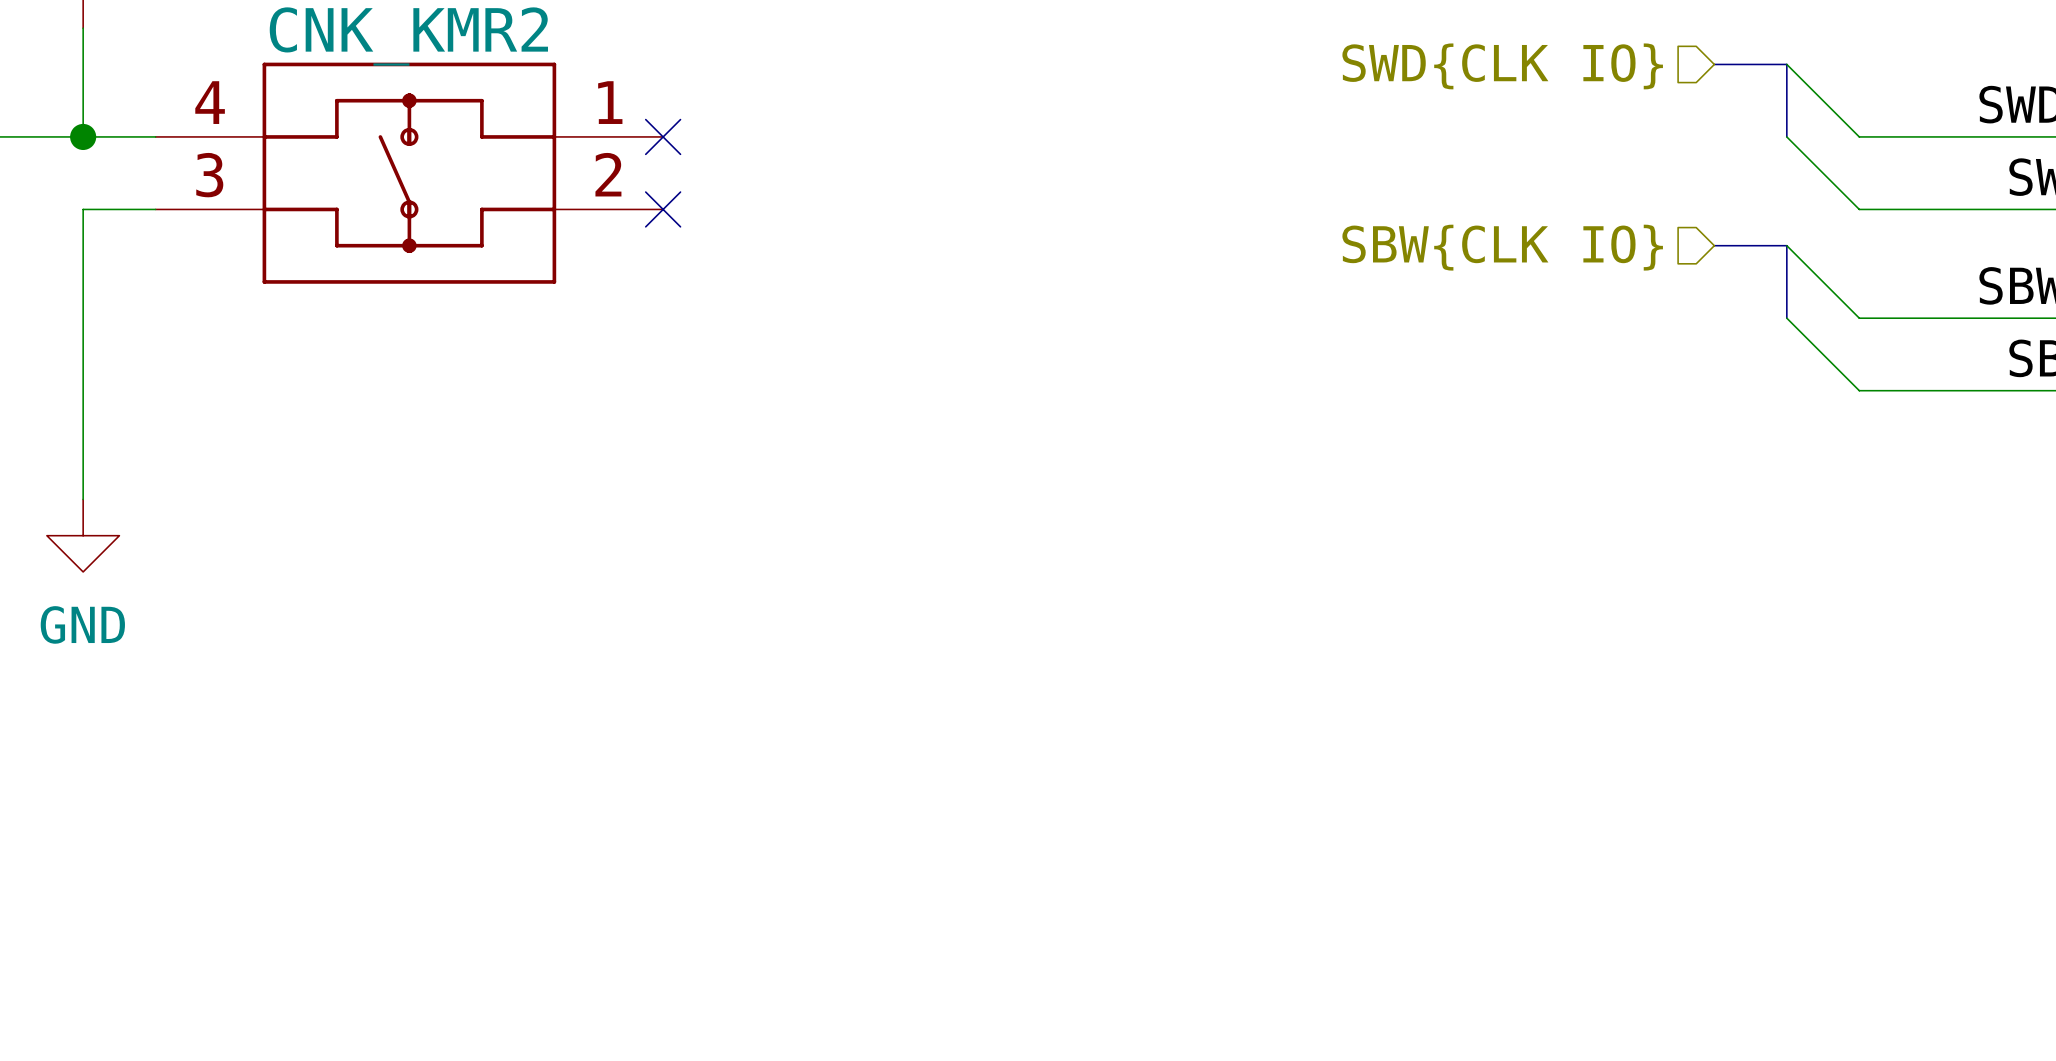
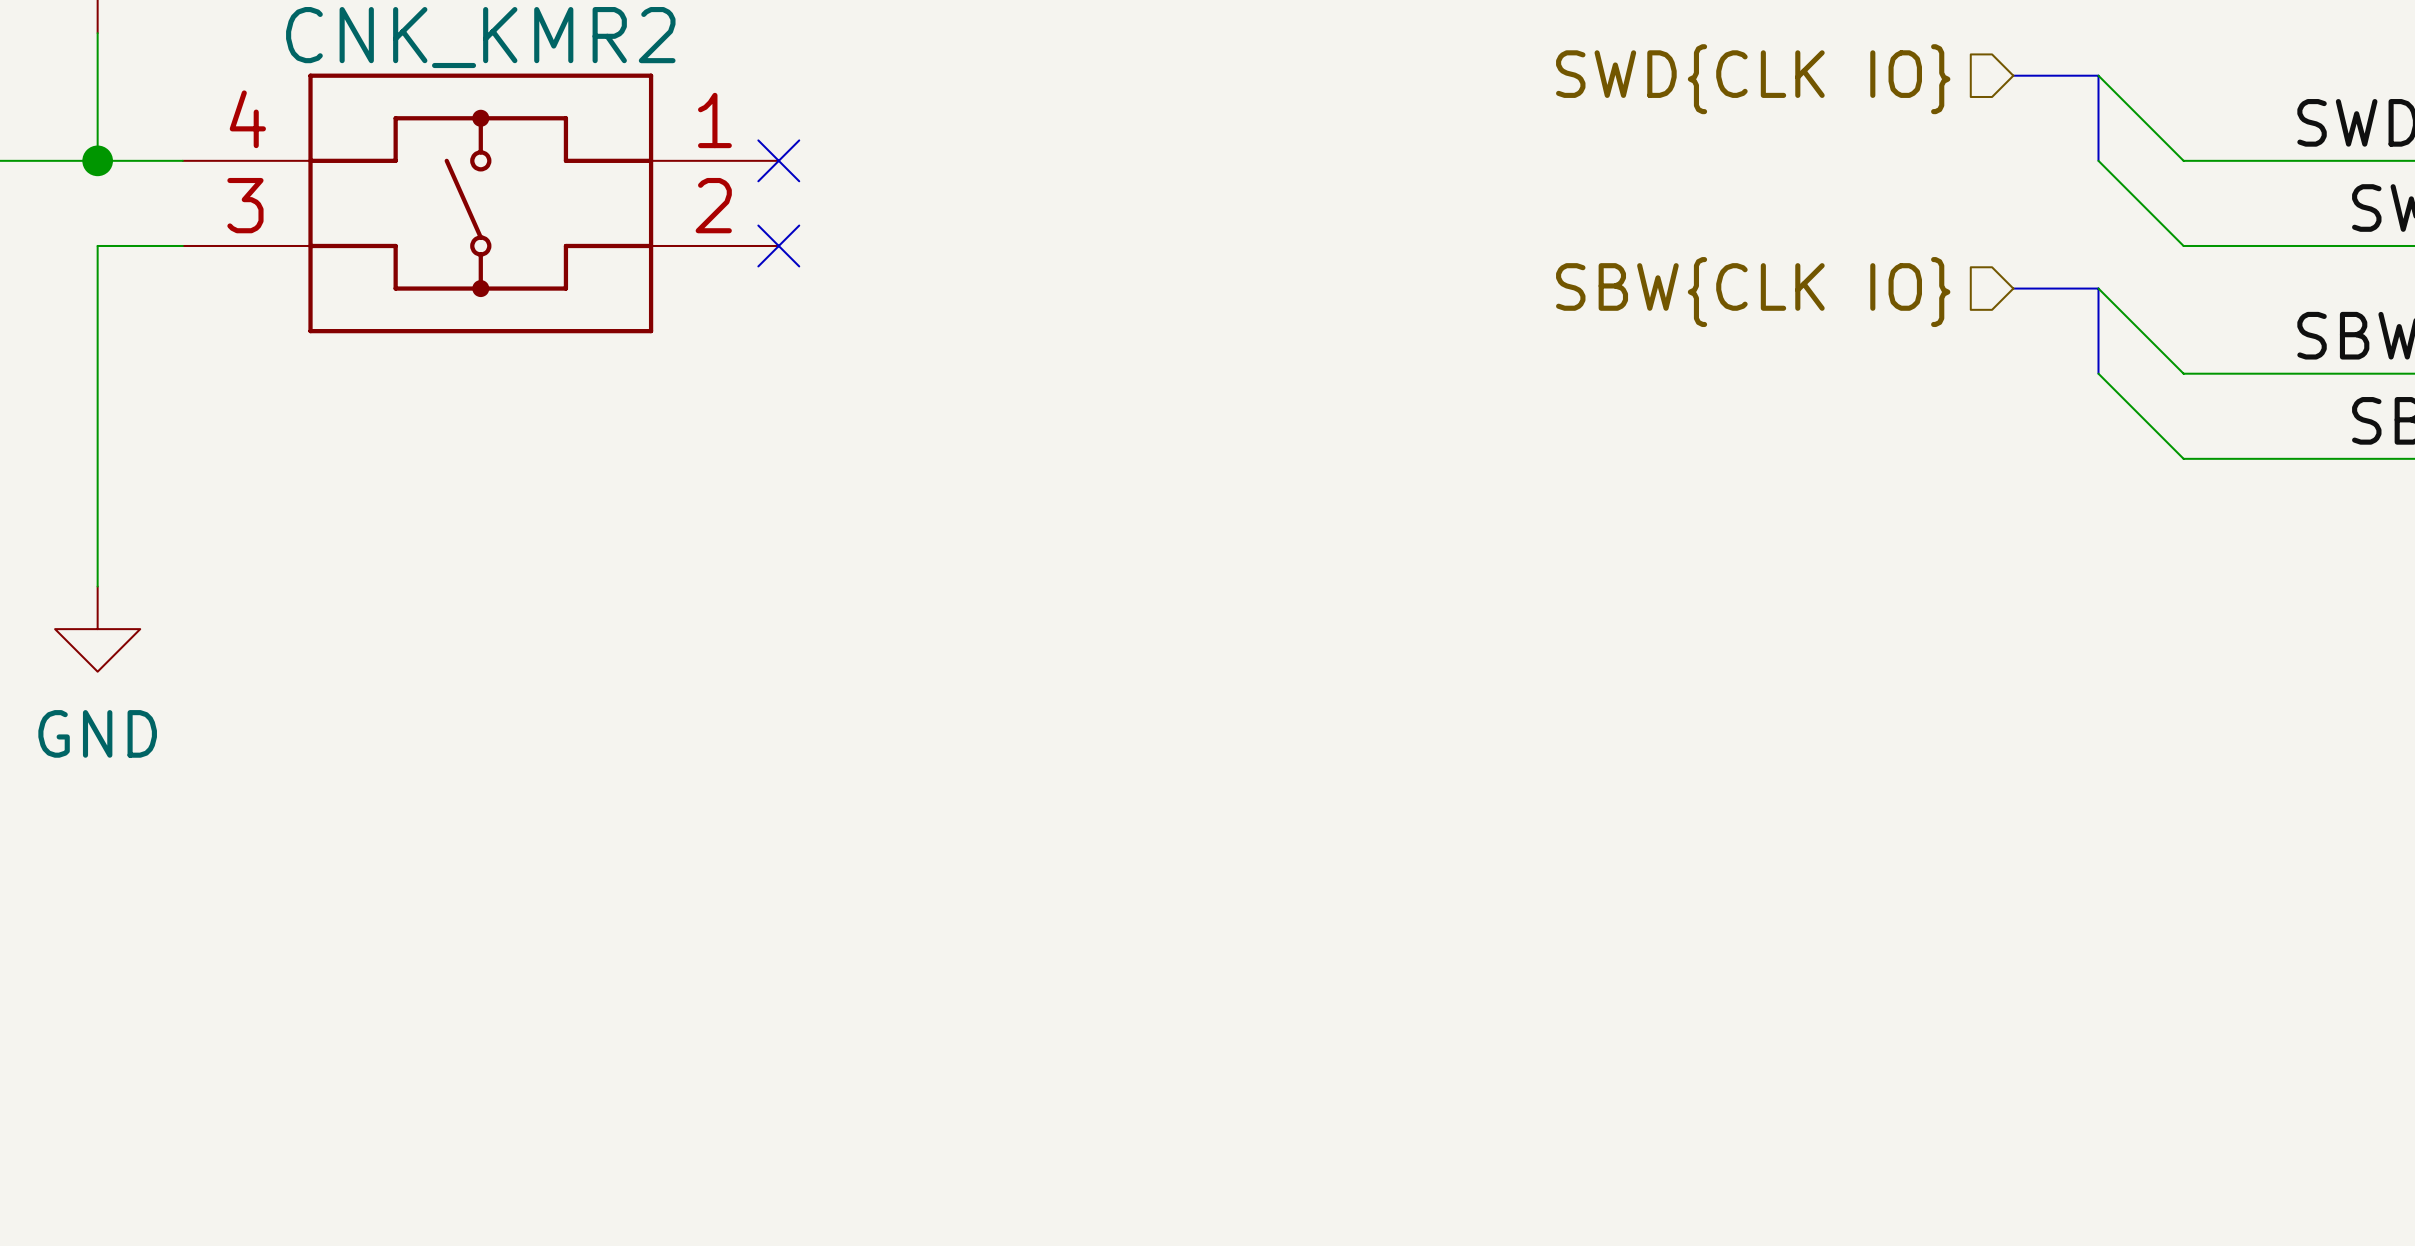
part symbol: [155, 62, 664, 284] -> [182, 73, 779, 334]

